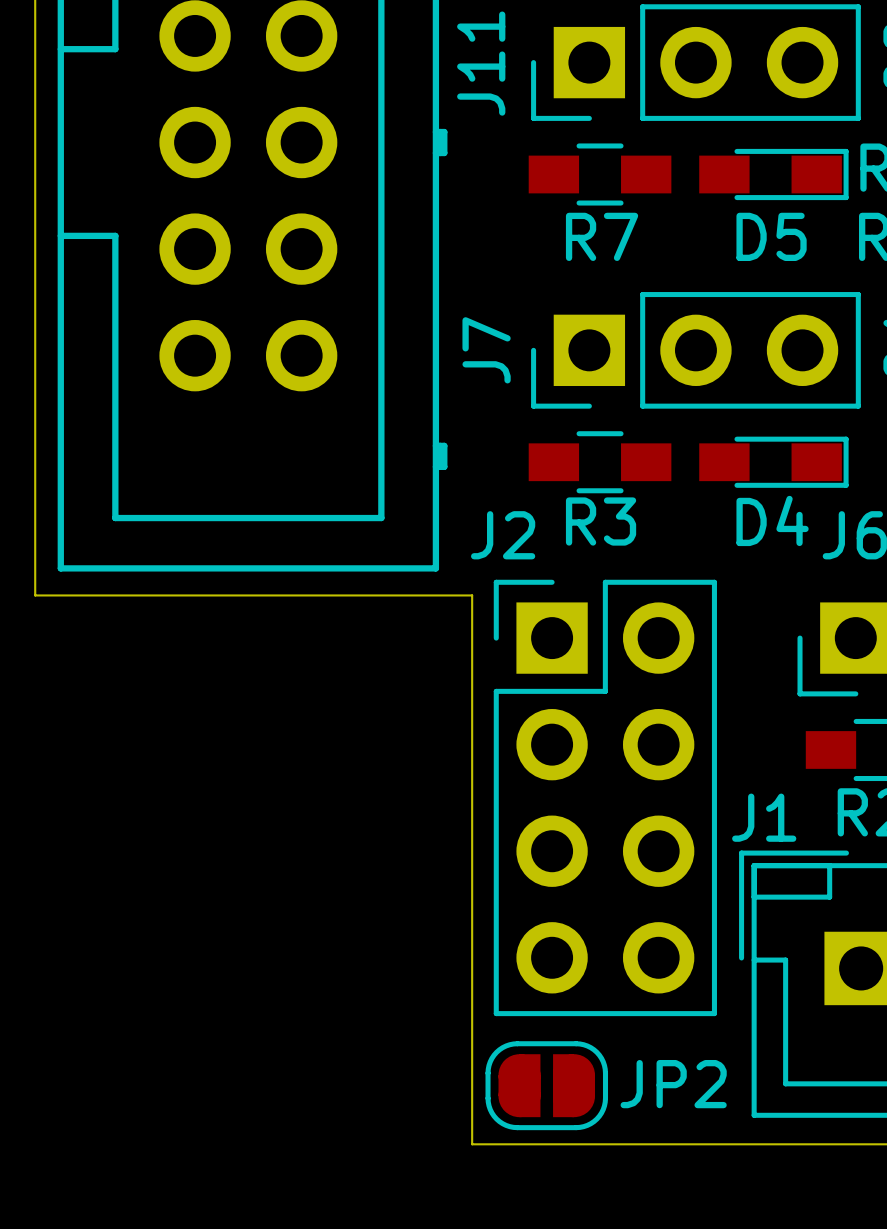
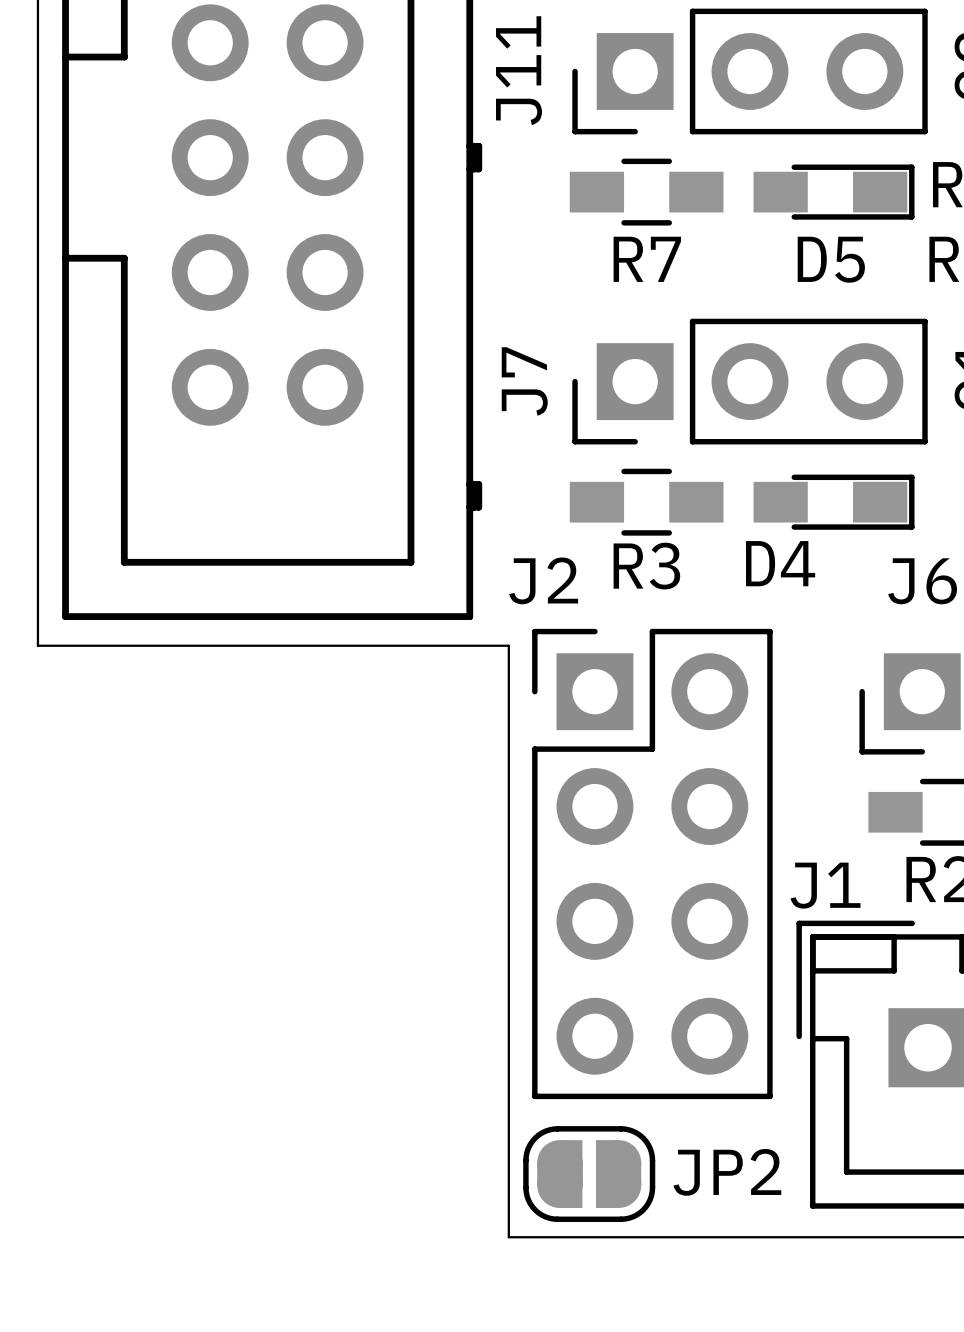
D4 name position: D4 (772, 520) -> D4 (780, 563)

